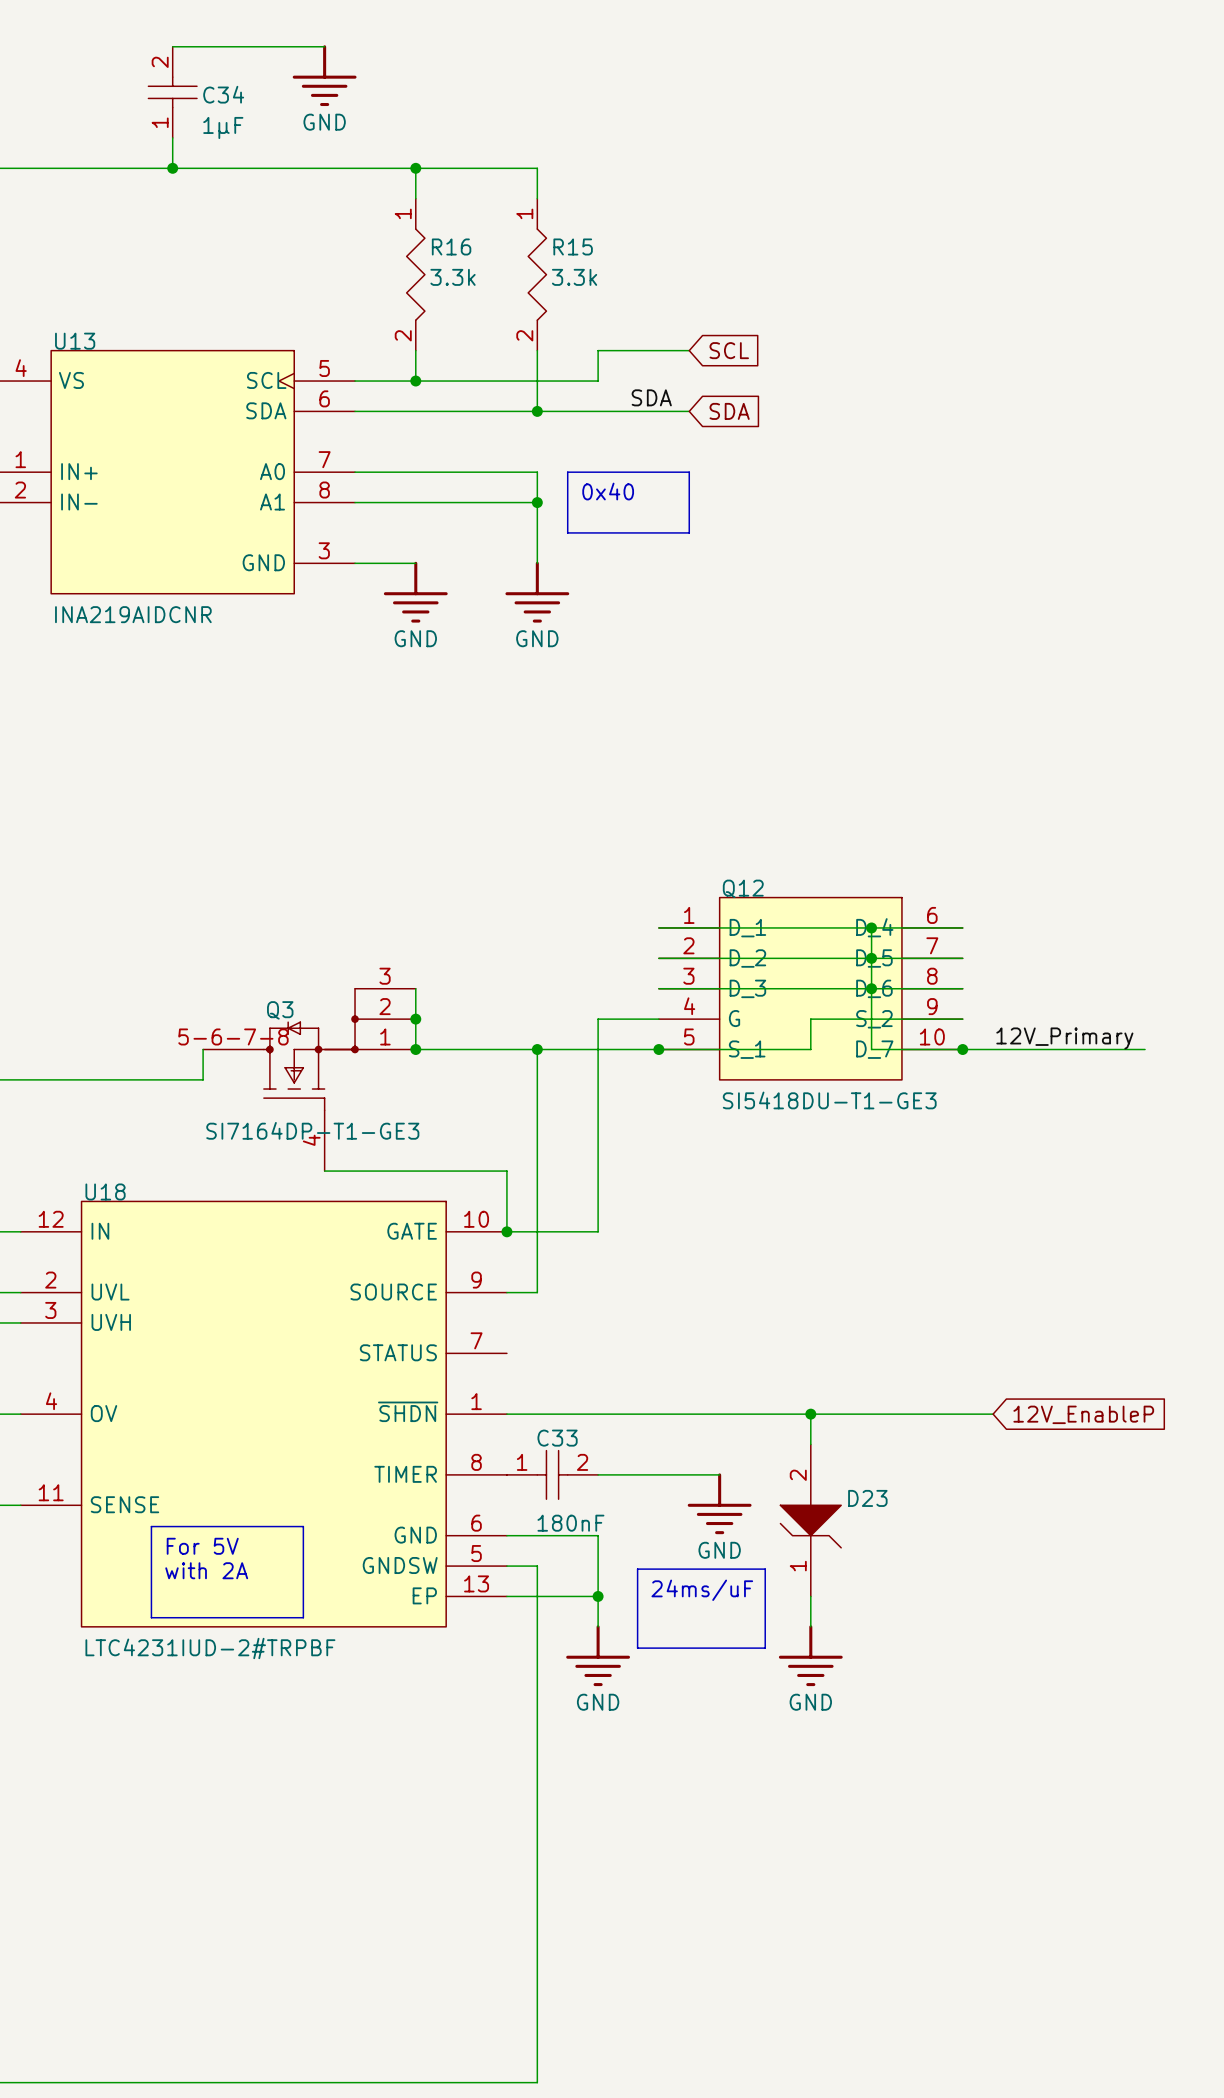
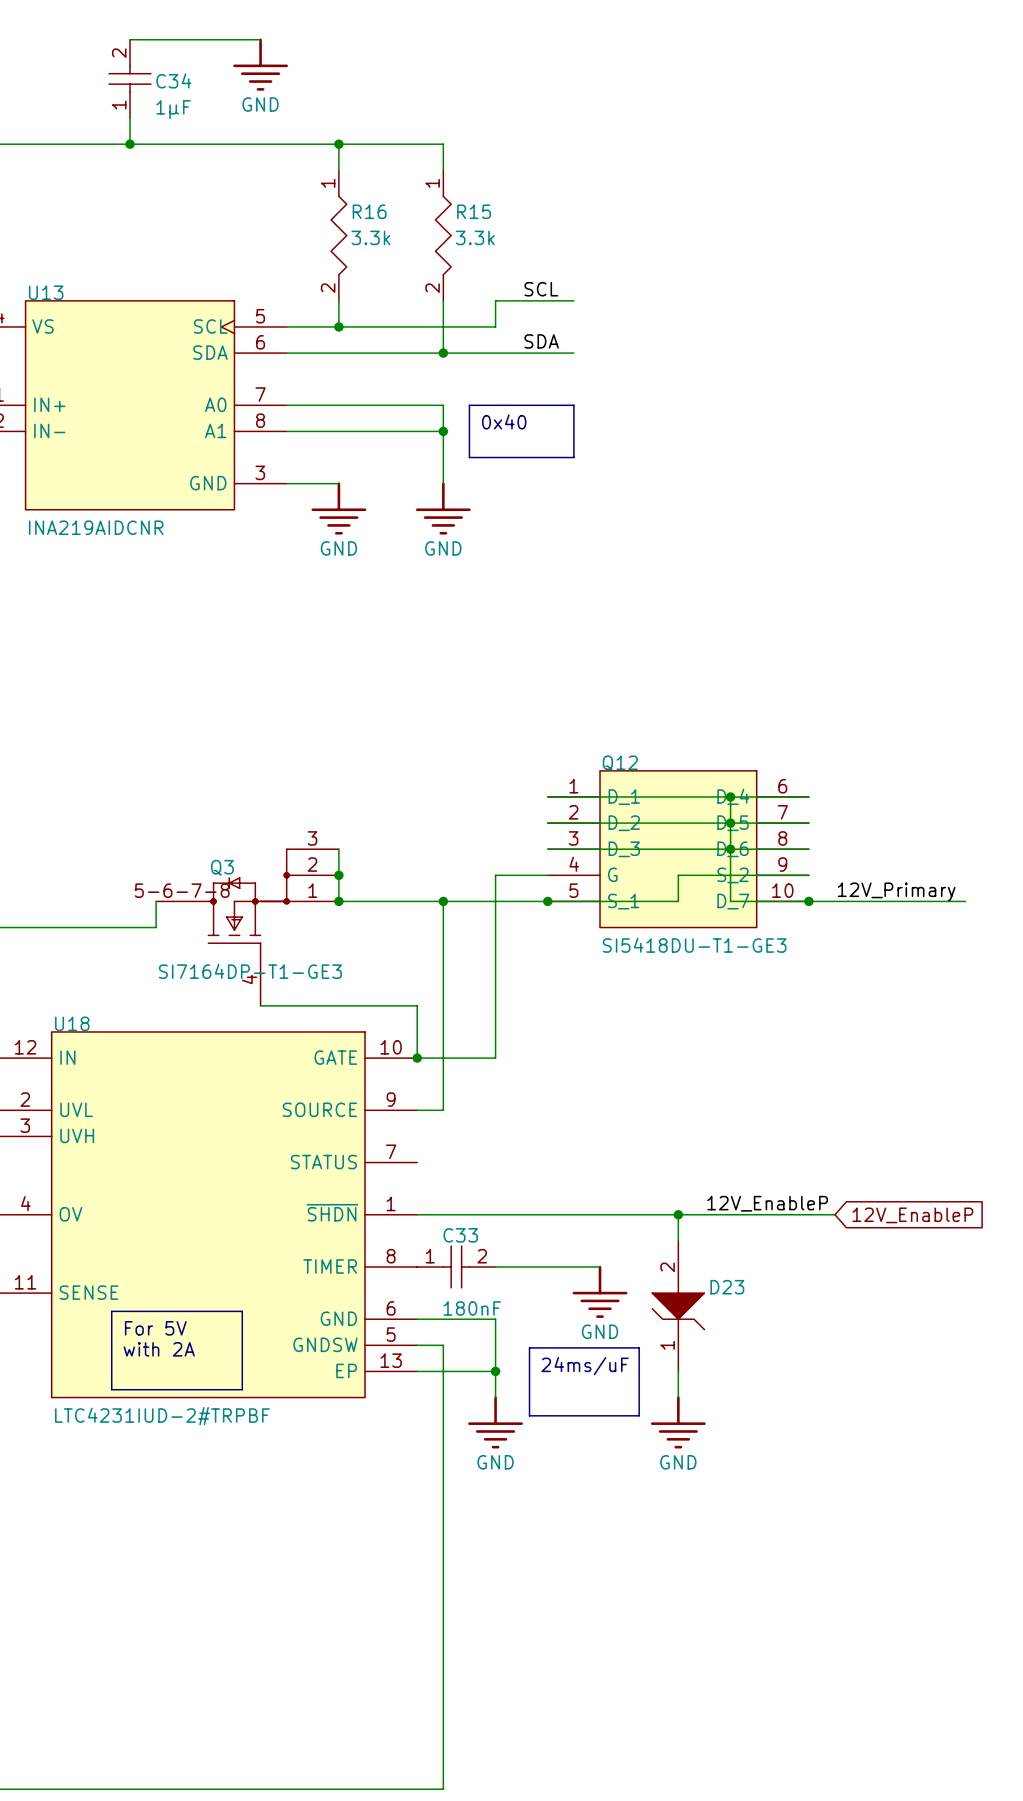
label: none -> SCL (541, 289)
global label: SCL (729, 350) -> none
global label: SDA (729, 411) -> none
label: none -> 12V_EnableP (767, 1203)

